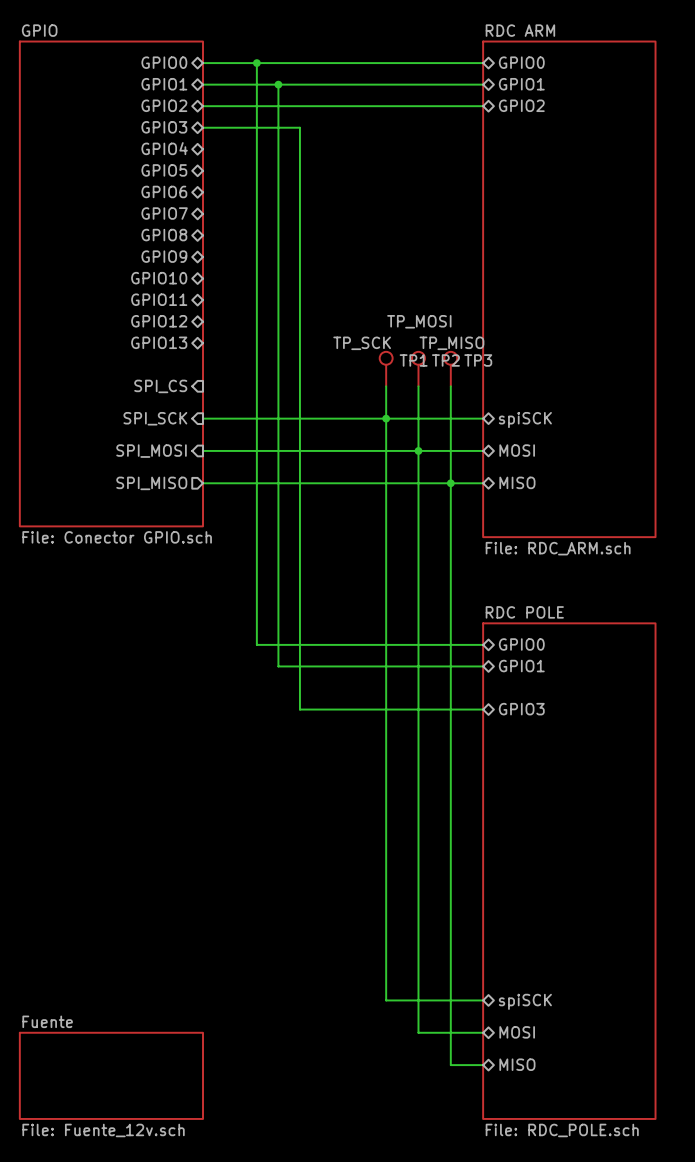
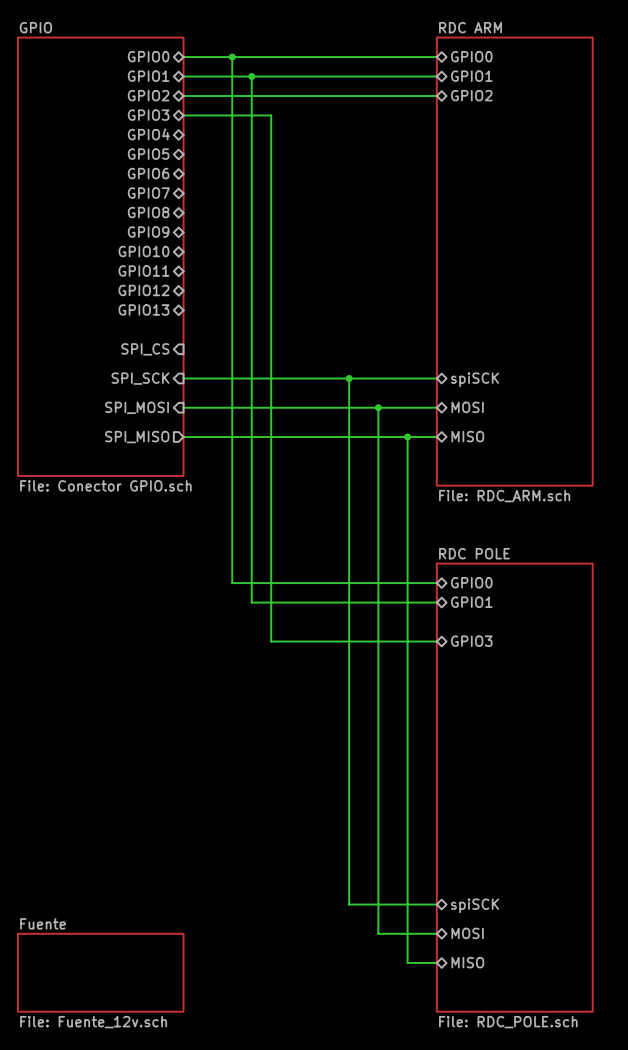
TP1: TP_SCK (386, 369) -> none
TP2: TP_MOSI (418, 369) -> none
TP3: TP_MISO (450, 369) -> none
wire: (386, 386) (386, 418) -> none
wire: (418, 386) (418, 450) -> none
wire: (450, 386) (450, 483) -> none

